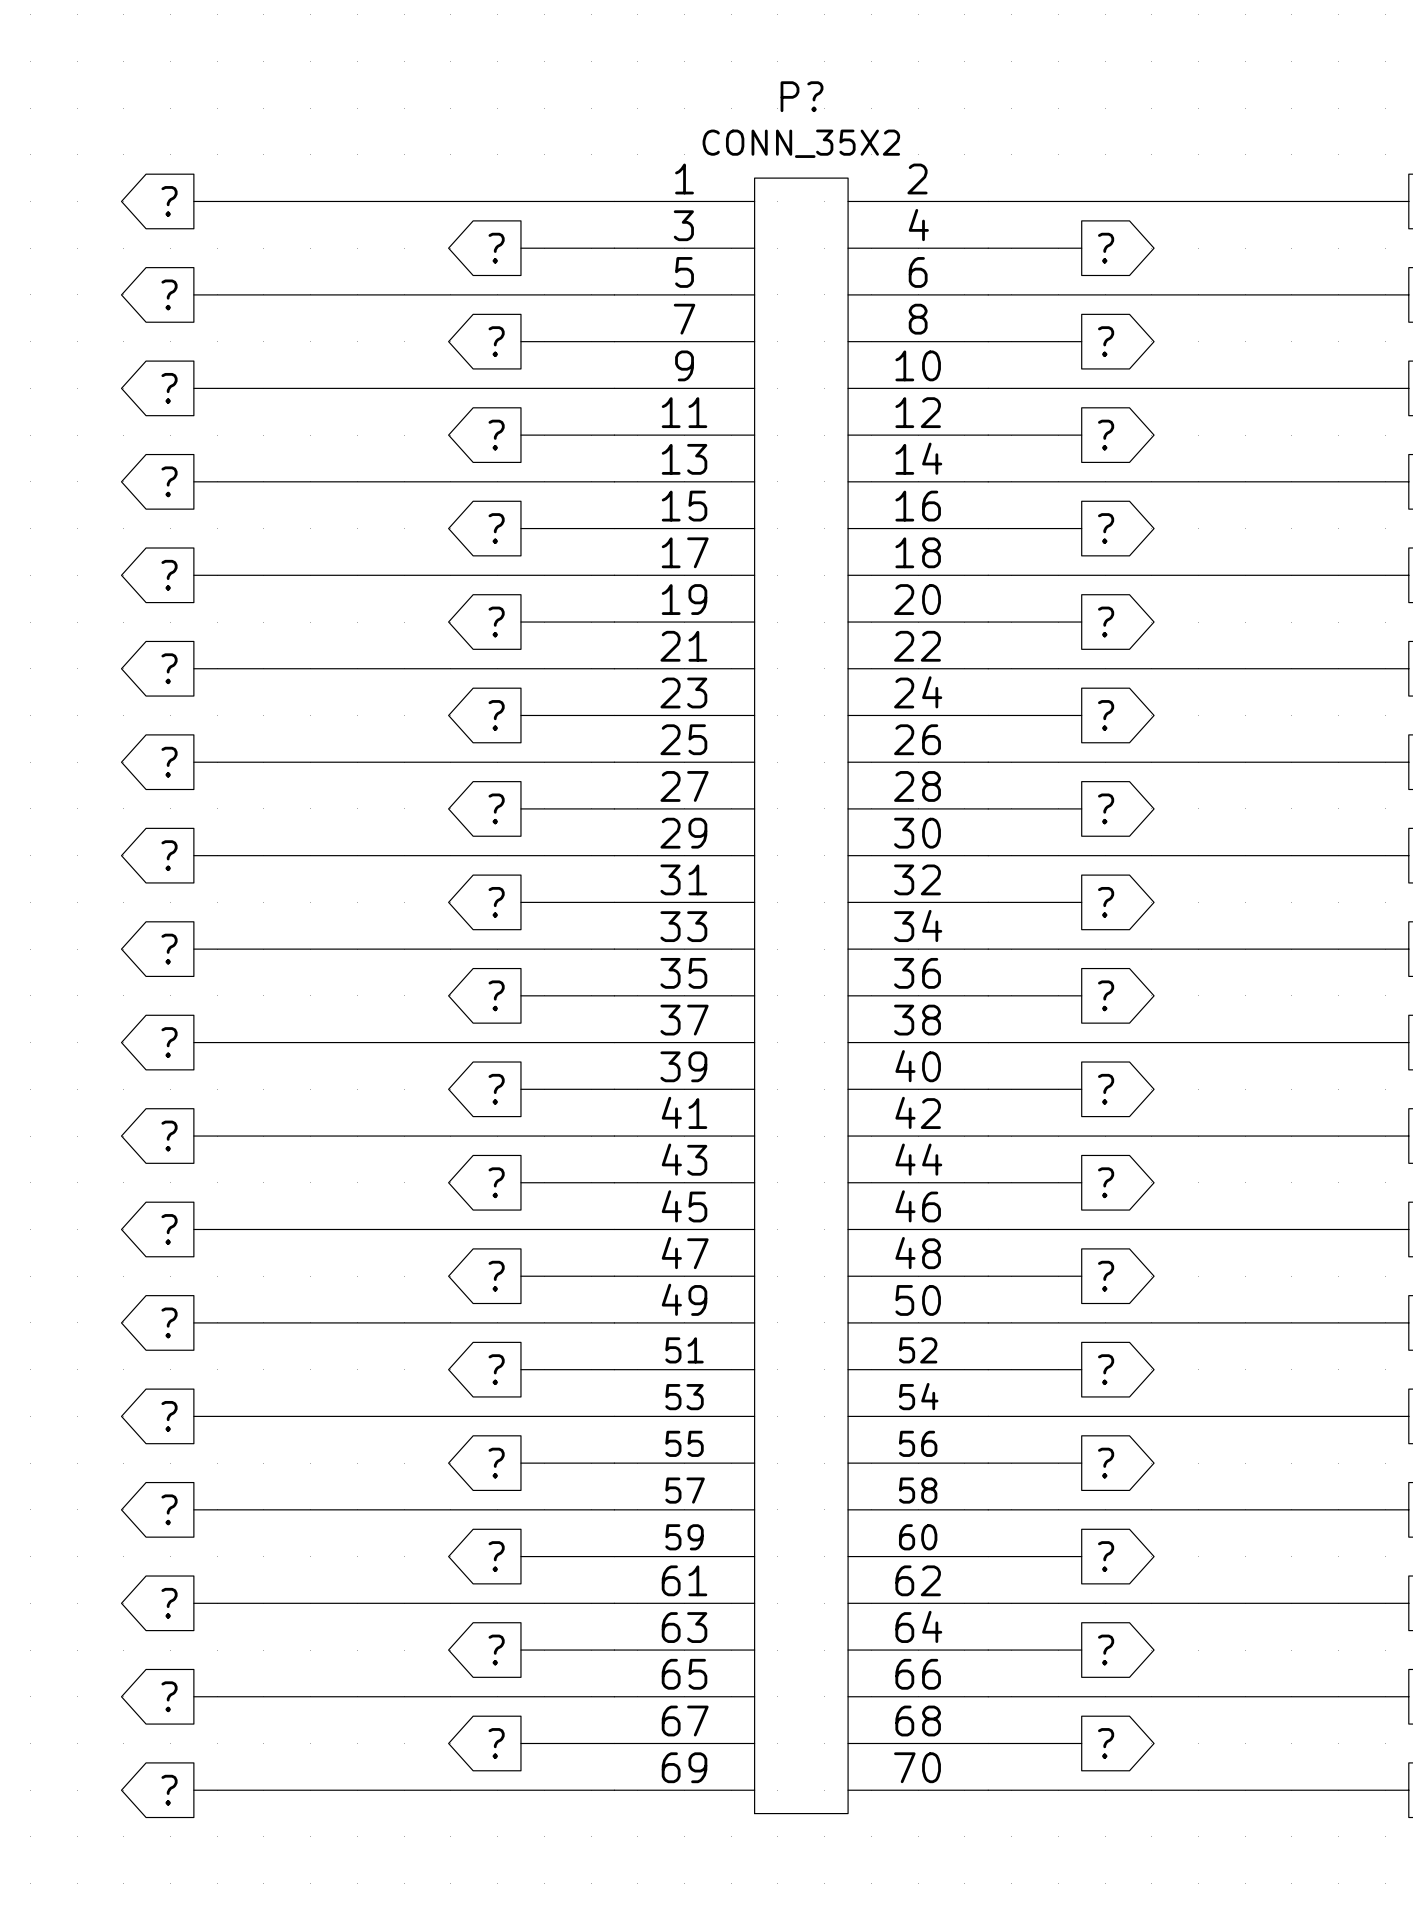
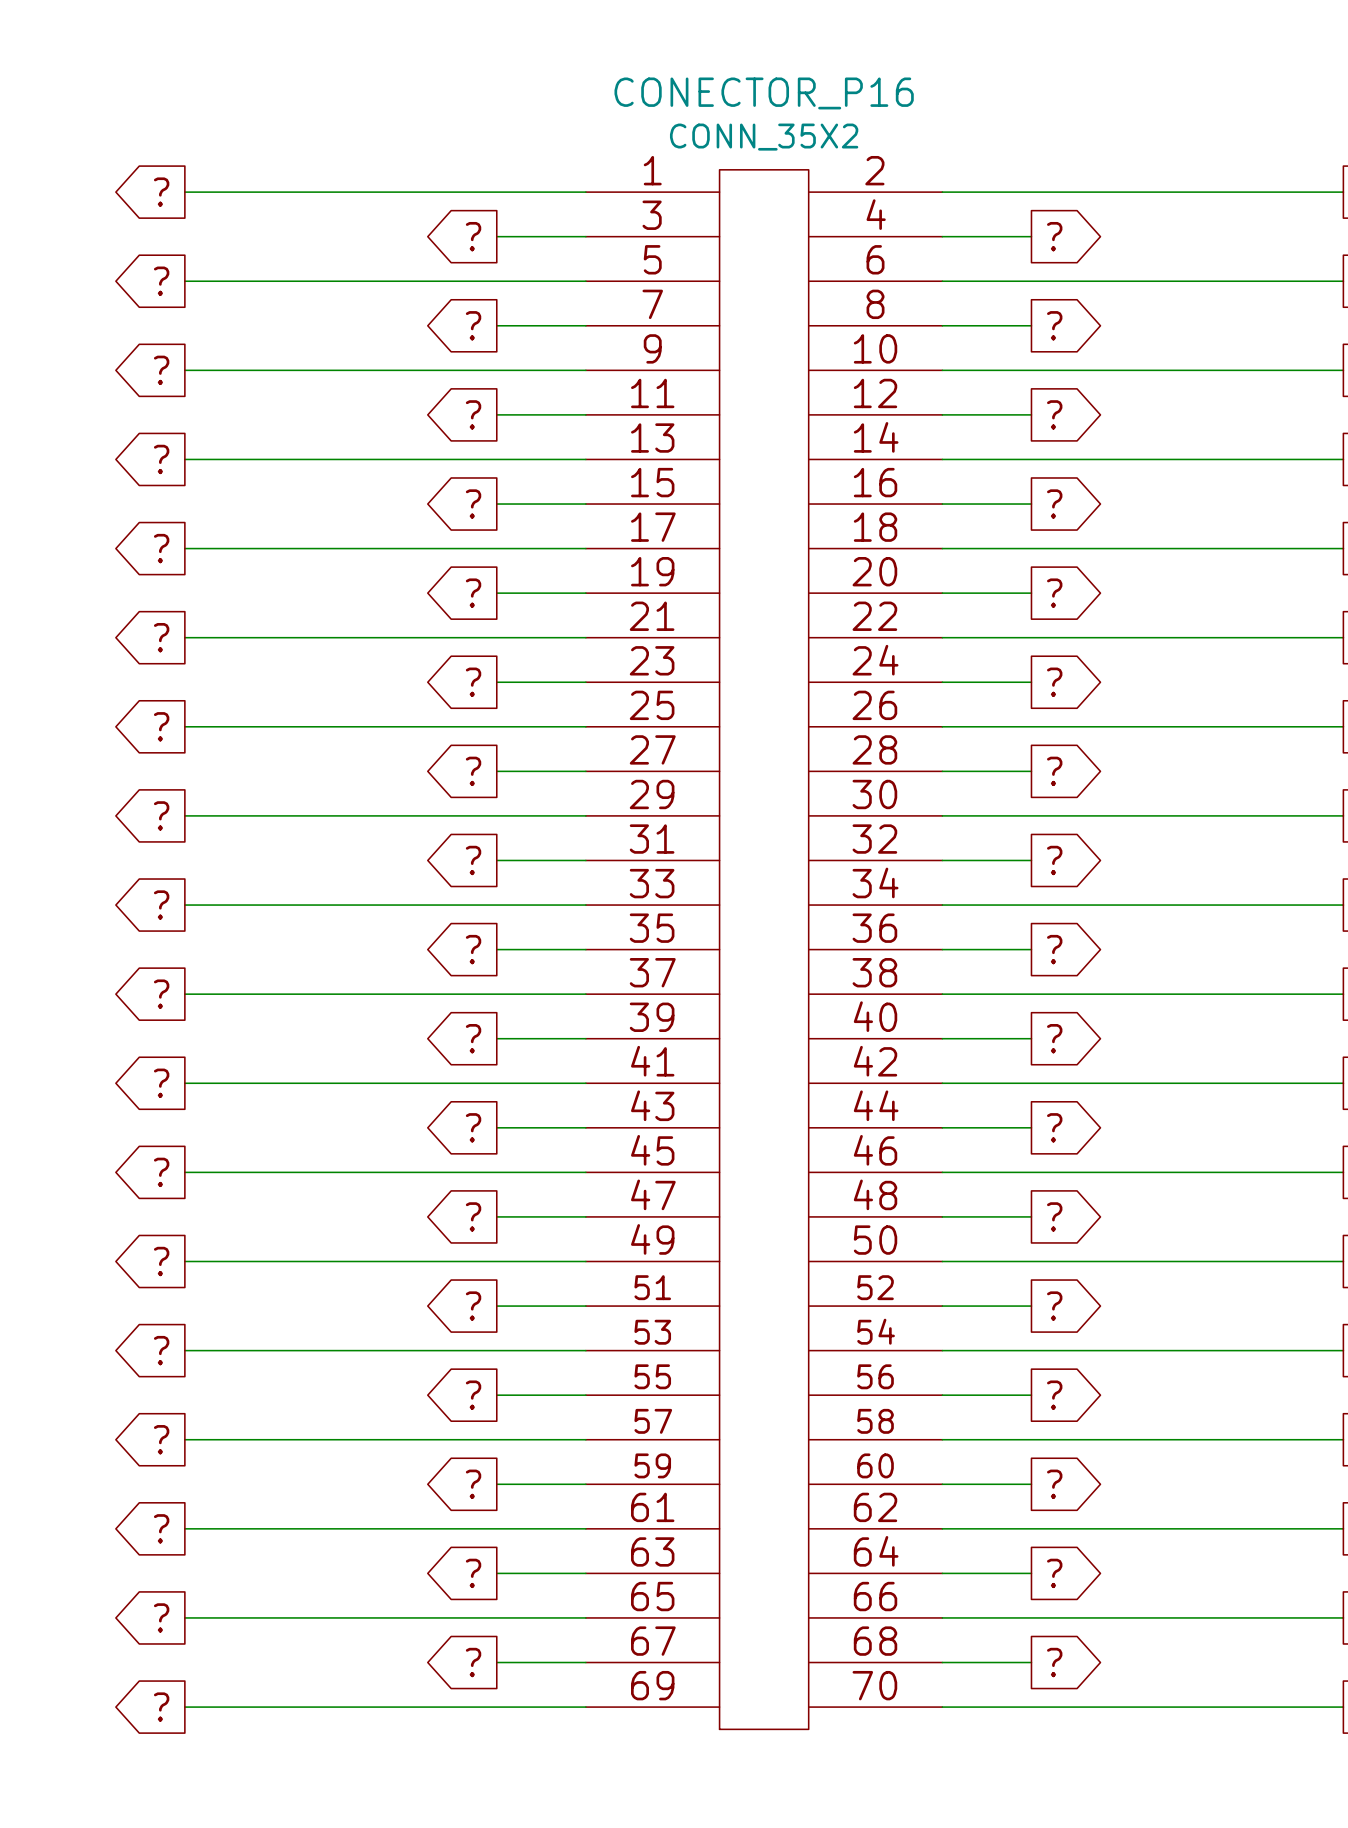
P? name: P? (802, 96) -> CONECTOR_P16 (764, 93)

